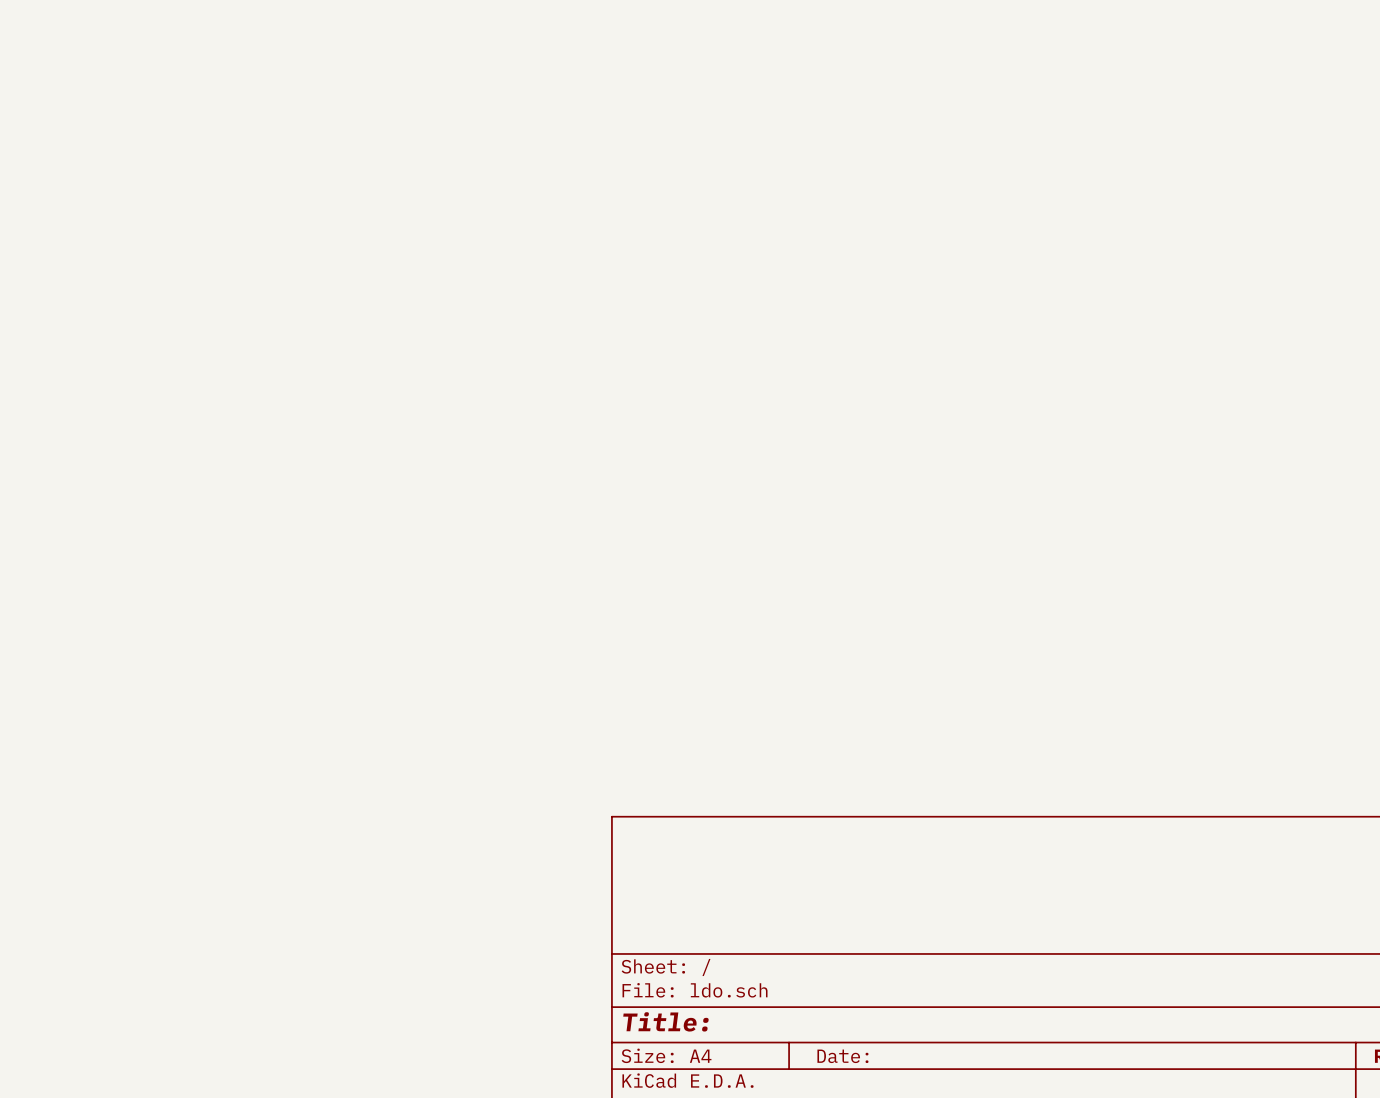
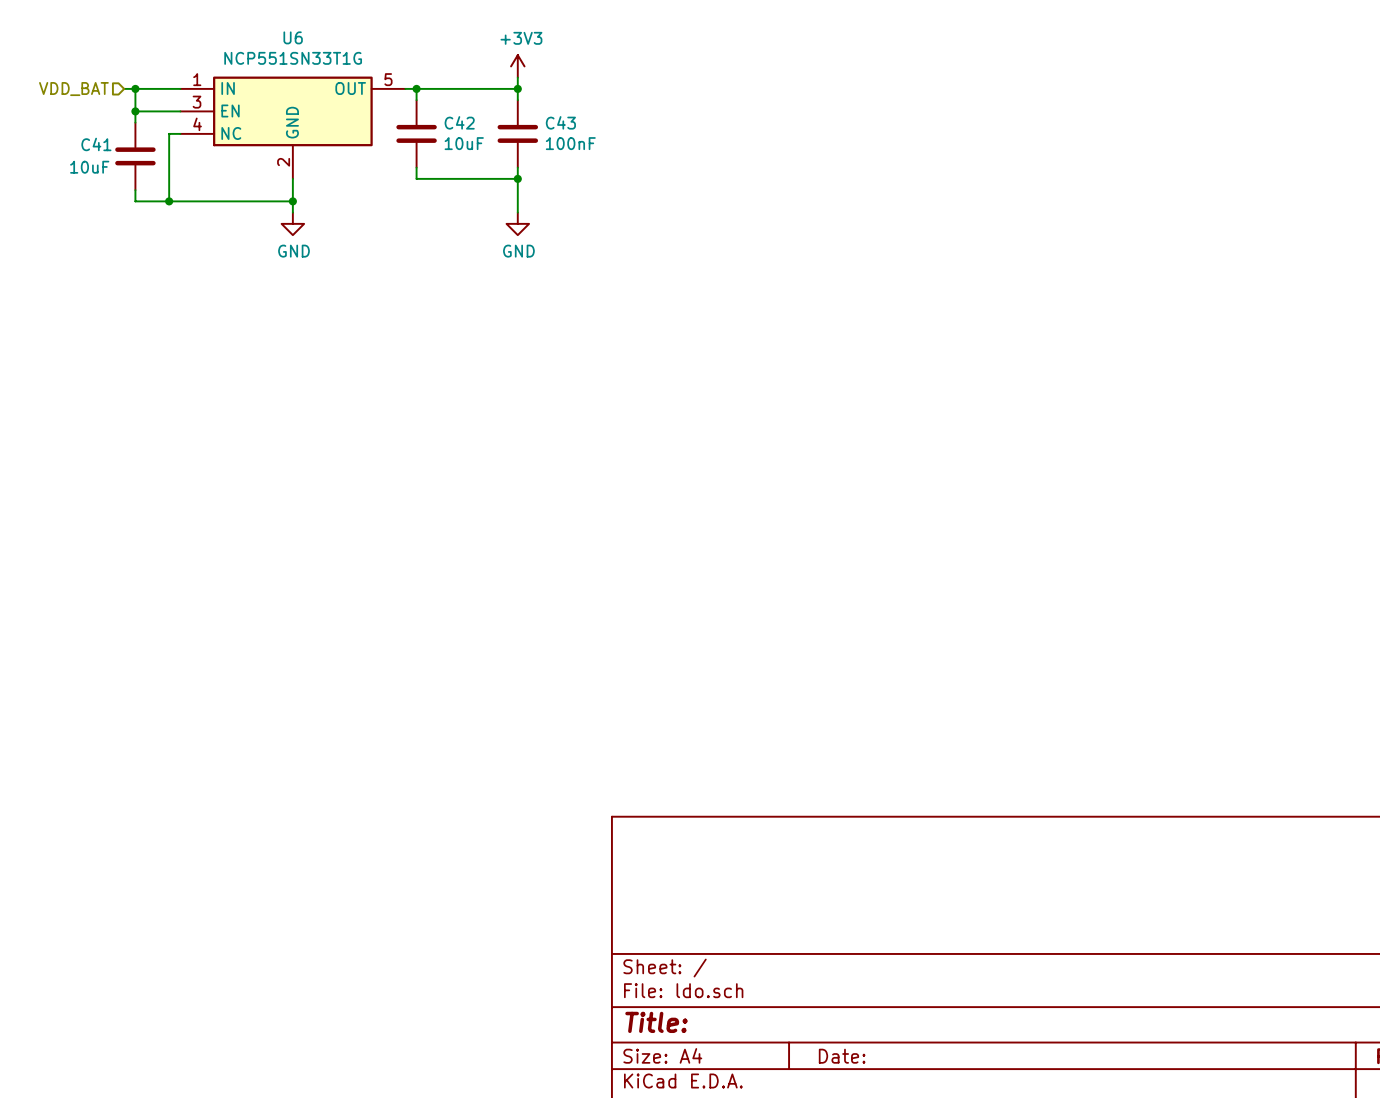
power symbol: none -> +3V3 (517, 66)
wire: none -> (517, 77) (517, 100)
wire: none -> (124, 88) (180, 88)
wire: none -> (135, 88) (135, 122)
junction: none -> (135, 88)
wire: none -> (405, 88) (517, 88)
wire: none -> (416, 88) (416, 100)
junction: none -> (416, 88)
junction: none -> (517, 88)
hierarchical label: none -> VDD_BAT (73, 89)
wire: none -> (135, 111) (180, 111)
junction: none -> (135, 111)
U6: none -> NCP551SN33T1G (292, 127)
wire: none -> (180, 133) (169, 133) (169, 201)
C42: none -> 10uF (416, 133)
C43: none -> 100nF (517, 133)
C41: none -> 10uF (135, 156)
wire: none -> (416, 167) (416, 178) (517, 178)
wire: none -> (517, 167) (517, 212)
wire: none -> (292, 178) (292, 212)
junction: none -> (517, 178)
wire: none -> (135, 190) (135, 201) (292, 201)
junction: none -> (169, 201)
junction: none -> (292, 201)
power symbol: none -> GND (292, 223)
power symbol: none -> GND (517, 223)

